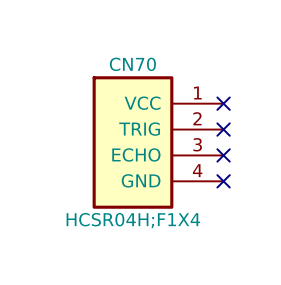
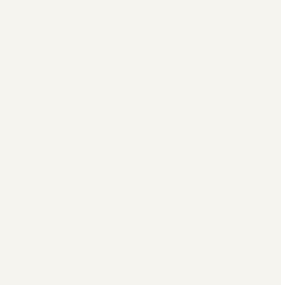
no-connect mark: (223, 103) -> none
no-connect mark: (223, 129) -> none
CN70: HCSR04H;F1X4 (158, 142) -> none
no-connect mark: (223, 155) -> none
no-connect mark: (223, 181) -> none

